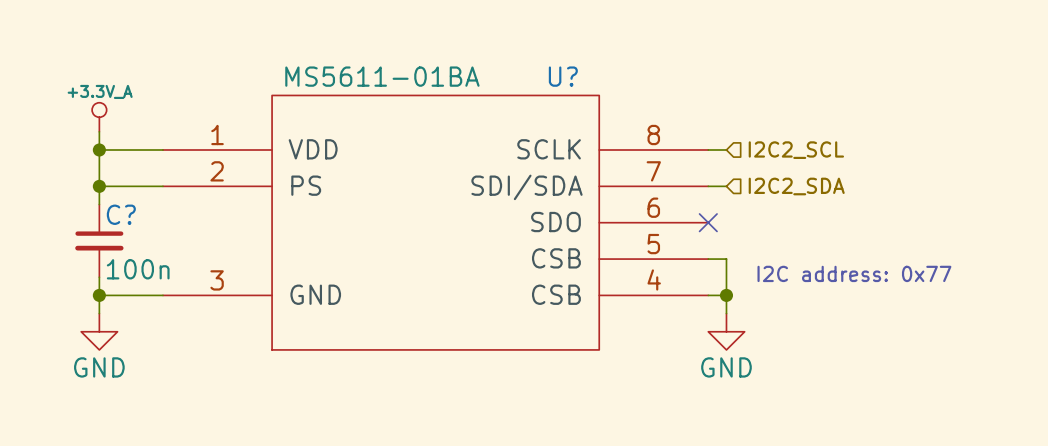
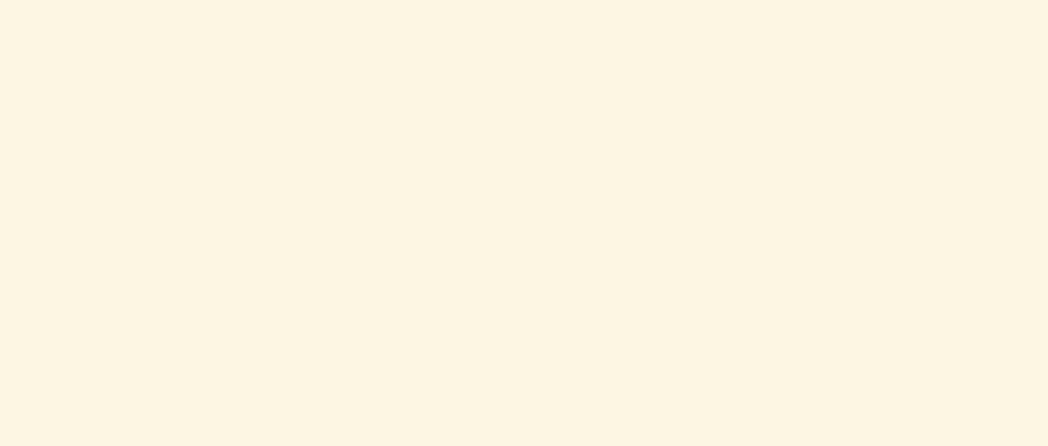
power symbol: +3.3V_A (99, 117) -> none
wire: (99, 131) (99, 204) -> none
wire: (99, 149) (162, 149) -> none
junction: (99, 149) -> none
wire: (708, 149) (726, 149) -> none
hierarchical label: I2C2_SCL (796, 150) -> none
wire: (99, 186) (162, 186) -> none
junction: (99, 186) -> none
wire: (708, 186) (726, 186) -> none
hierarchical label: I2C2_SDA (796, 186) -> none
U?: MS5611-01BA (435, 222) -> none
no-connect mark: (708, 222) -> none
C?: 100n (99, 240) -> none
wire: (708, 259) (726, 259) (726, 313) -> none
text: I2C address: 0x77 (854, 273) -> none
wire: (99, 277) (99, 313) -> none
wire: (99, 295) (162, 295) -> none
junction: (99, 295) -> none
wire: (708, 295) (726, 295) -> none
junction: (726, 295) -> none
power symbol: GND (99, 331) -> none
power symbol: GND (726, 331) -> none

